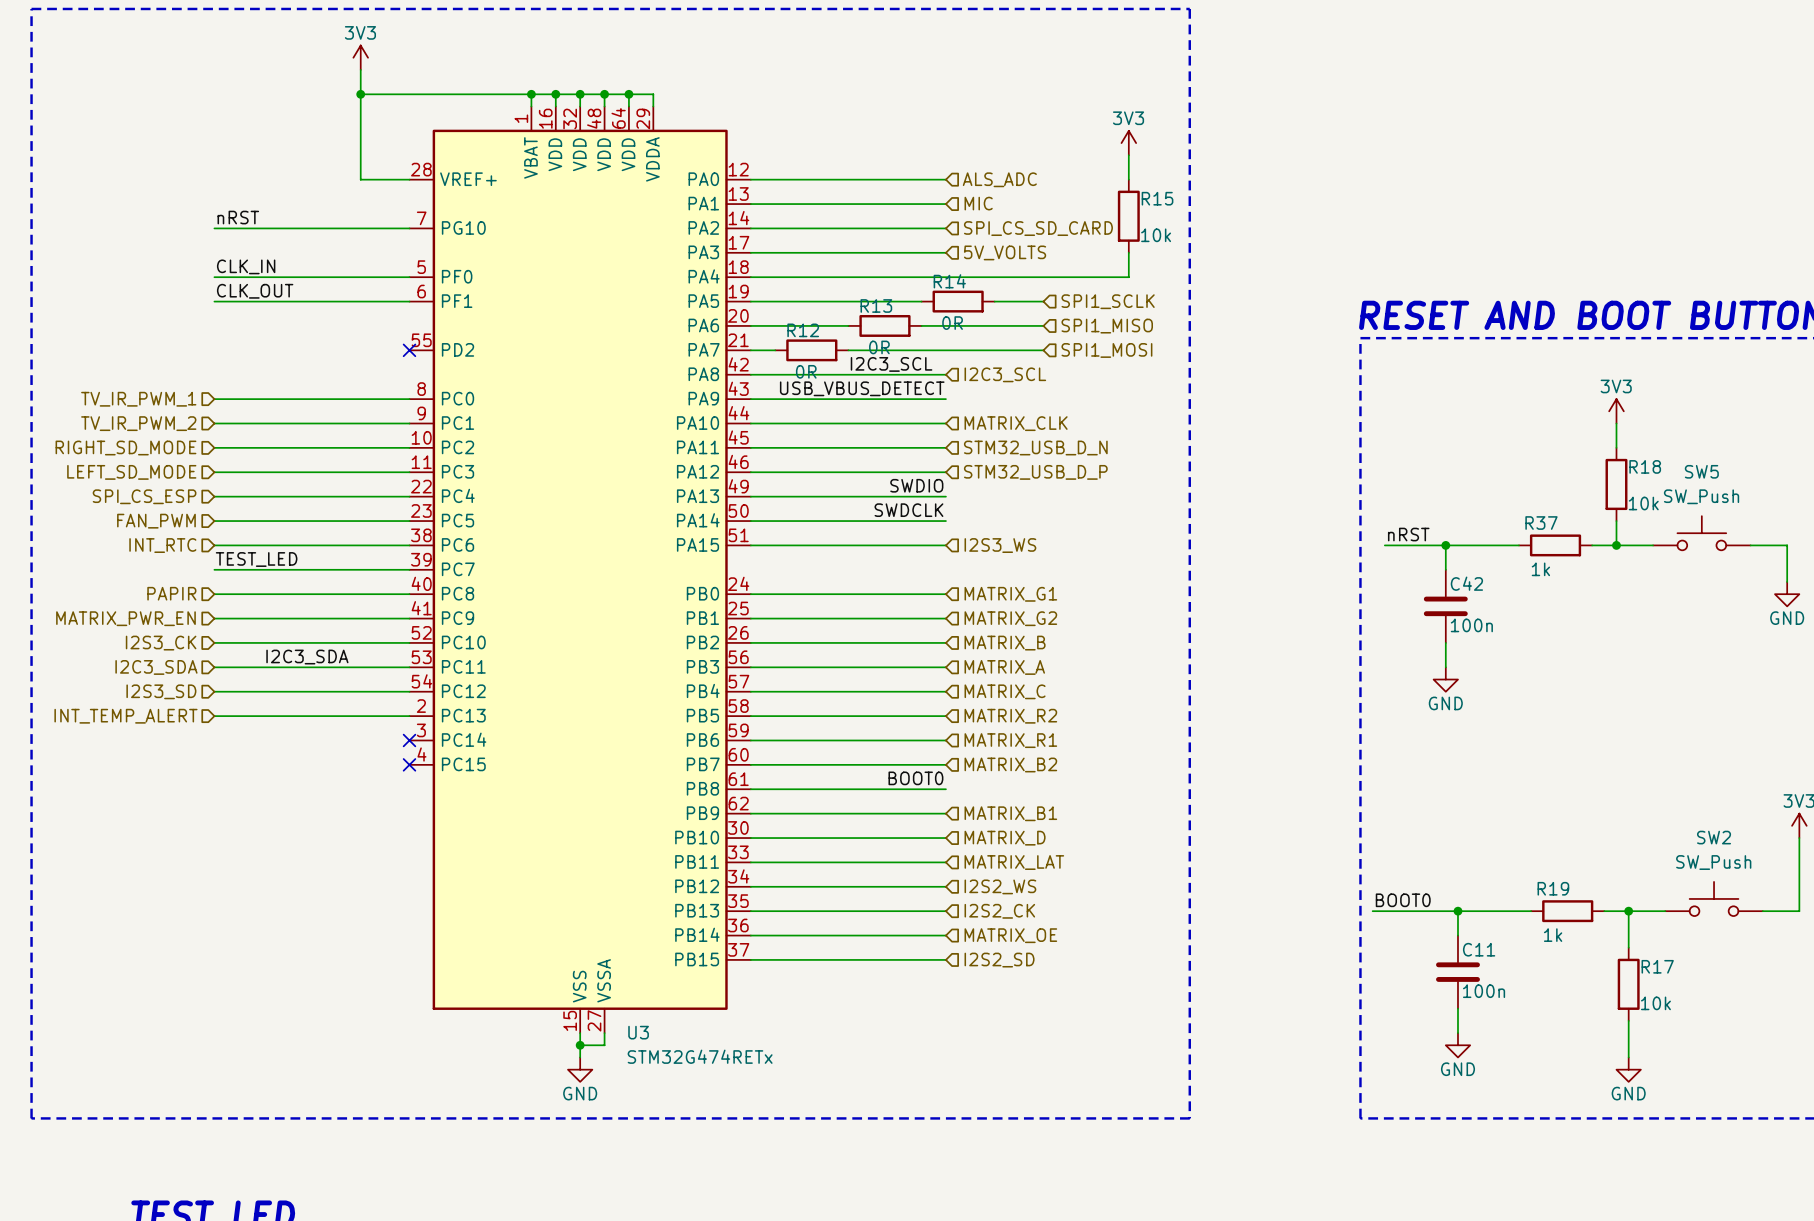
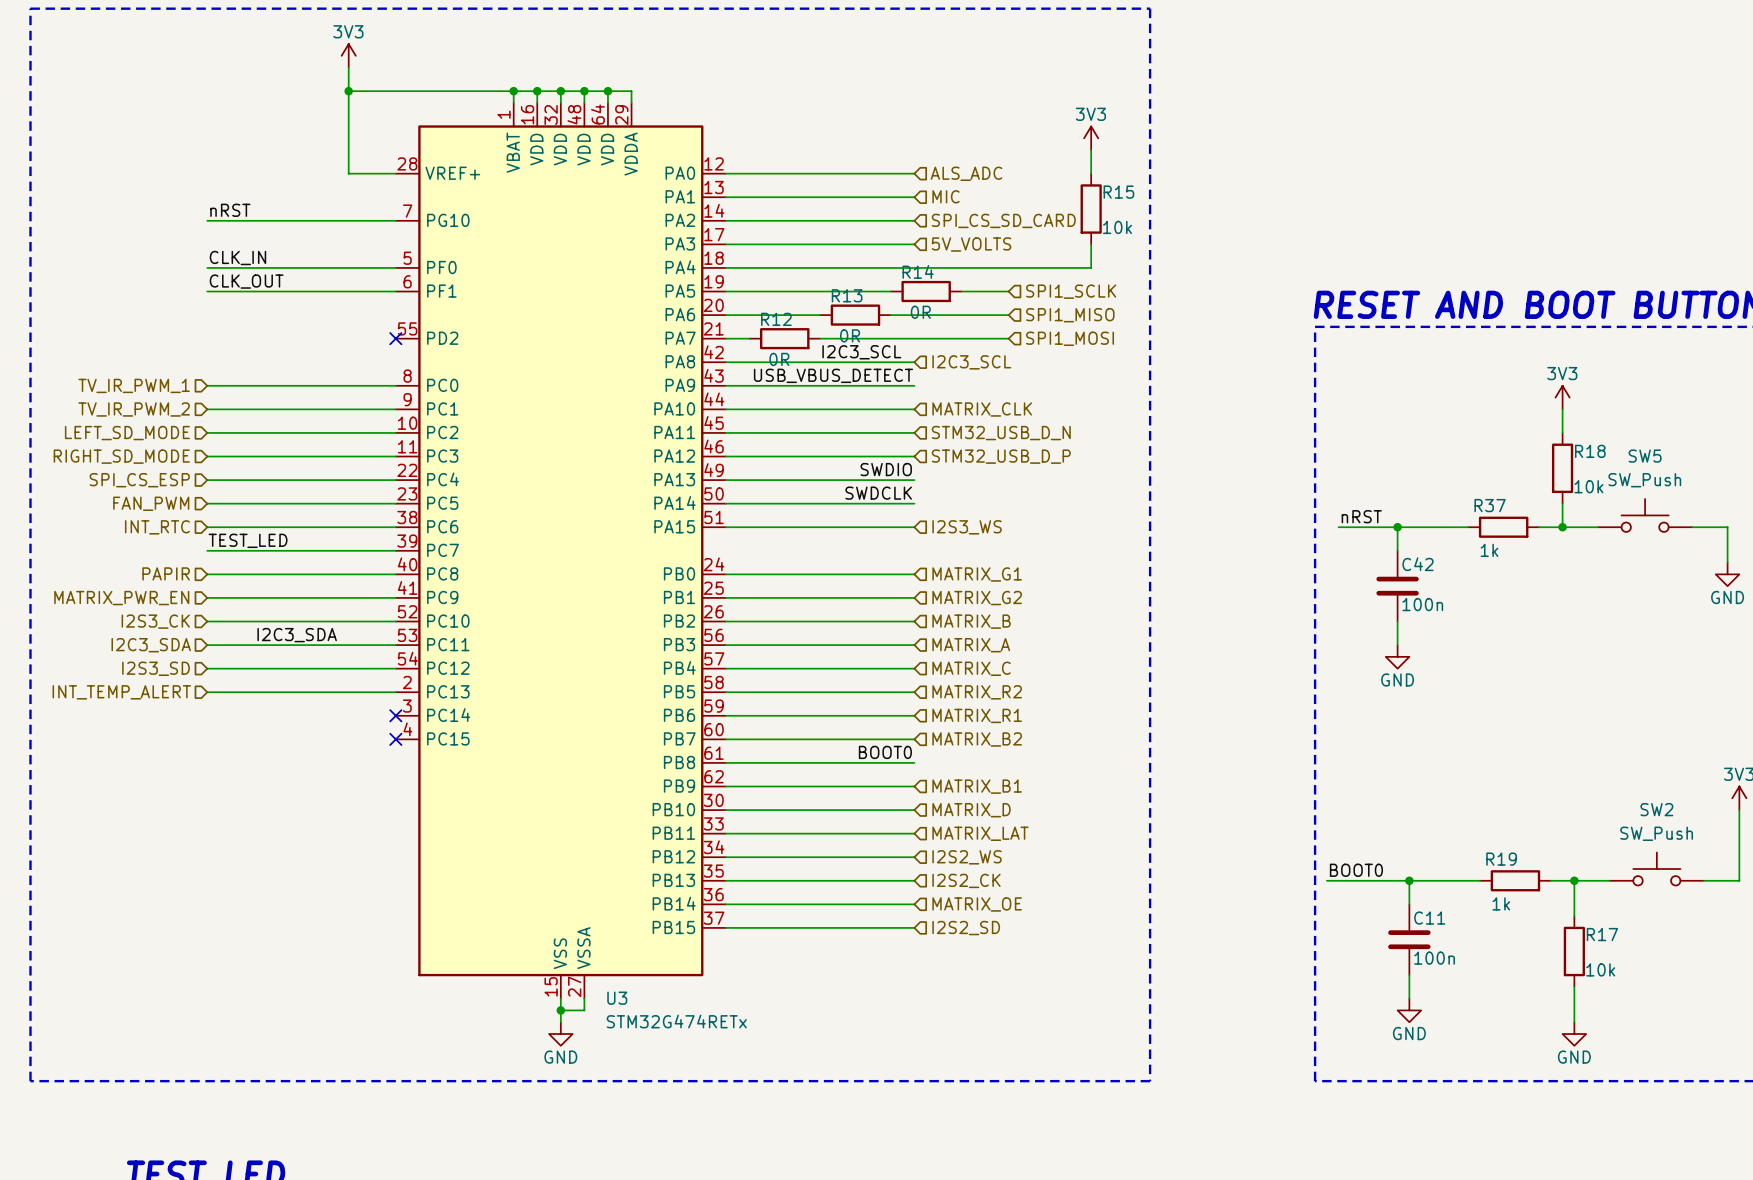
hierarchical label: RIGHT_SD_MODE (125, 448) -> LEFT_SD_MODE (127, 433)
hierarchical label: LEFT_SD_MODE (131, 472) -> RIGHT_SD_MODE (121, 456)

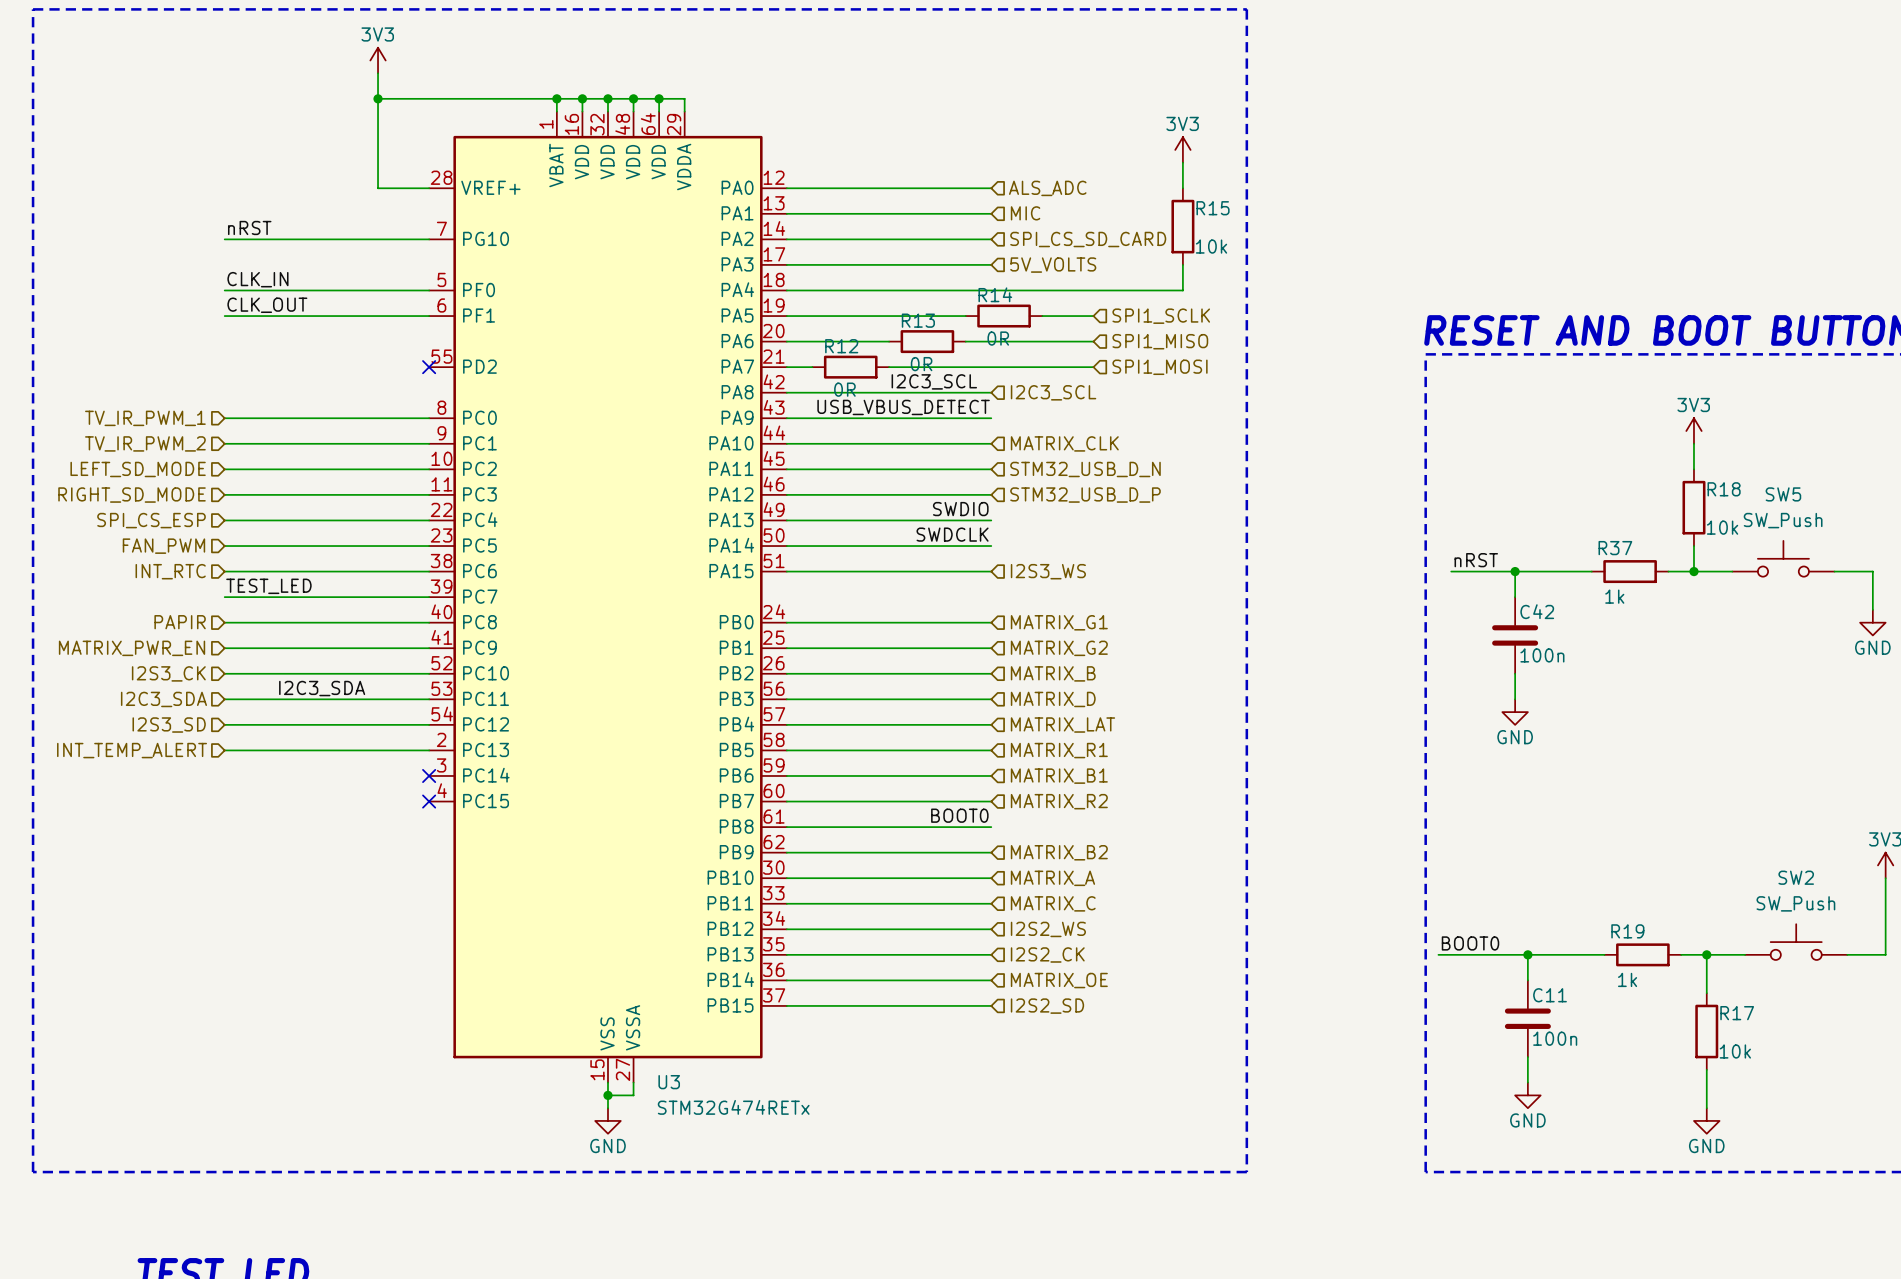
hierarchical label: MATRIX_A (971, 645) -> MATRIX_D (1053, 699)
hierarchical label: MATRIX_C (971, 668) -> MATRIX_LAT (1062, 725)
hierarchical label: MATRIX_R2 (977, 692) -> MATRIX_R1 (1059, 750)
hierarchical label: MATRIX_R1 (977, 715) -> MATRIX_B1 (1059, 776)
hierarchical label: MATRIX_B2 (977, 739) -> MATRIX_R2 (1059, 801)
hierarchical label: MATRIX_B1 (977, 786) -> MATRIX_B2 (1059, 852)
hierarchical label: MATRIX_D (971, 810) -> MATRIX_A (1052, 878)
hierarchical label: MATRIX_LAT (980, 833) -> MATRIX_C (1053, 903)

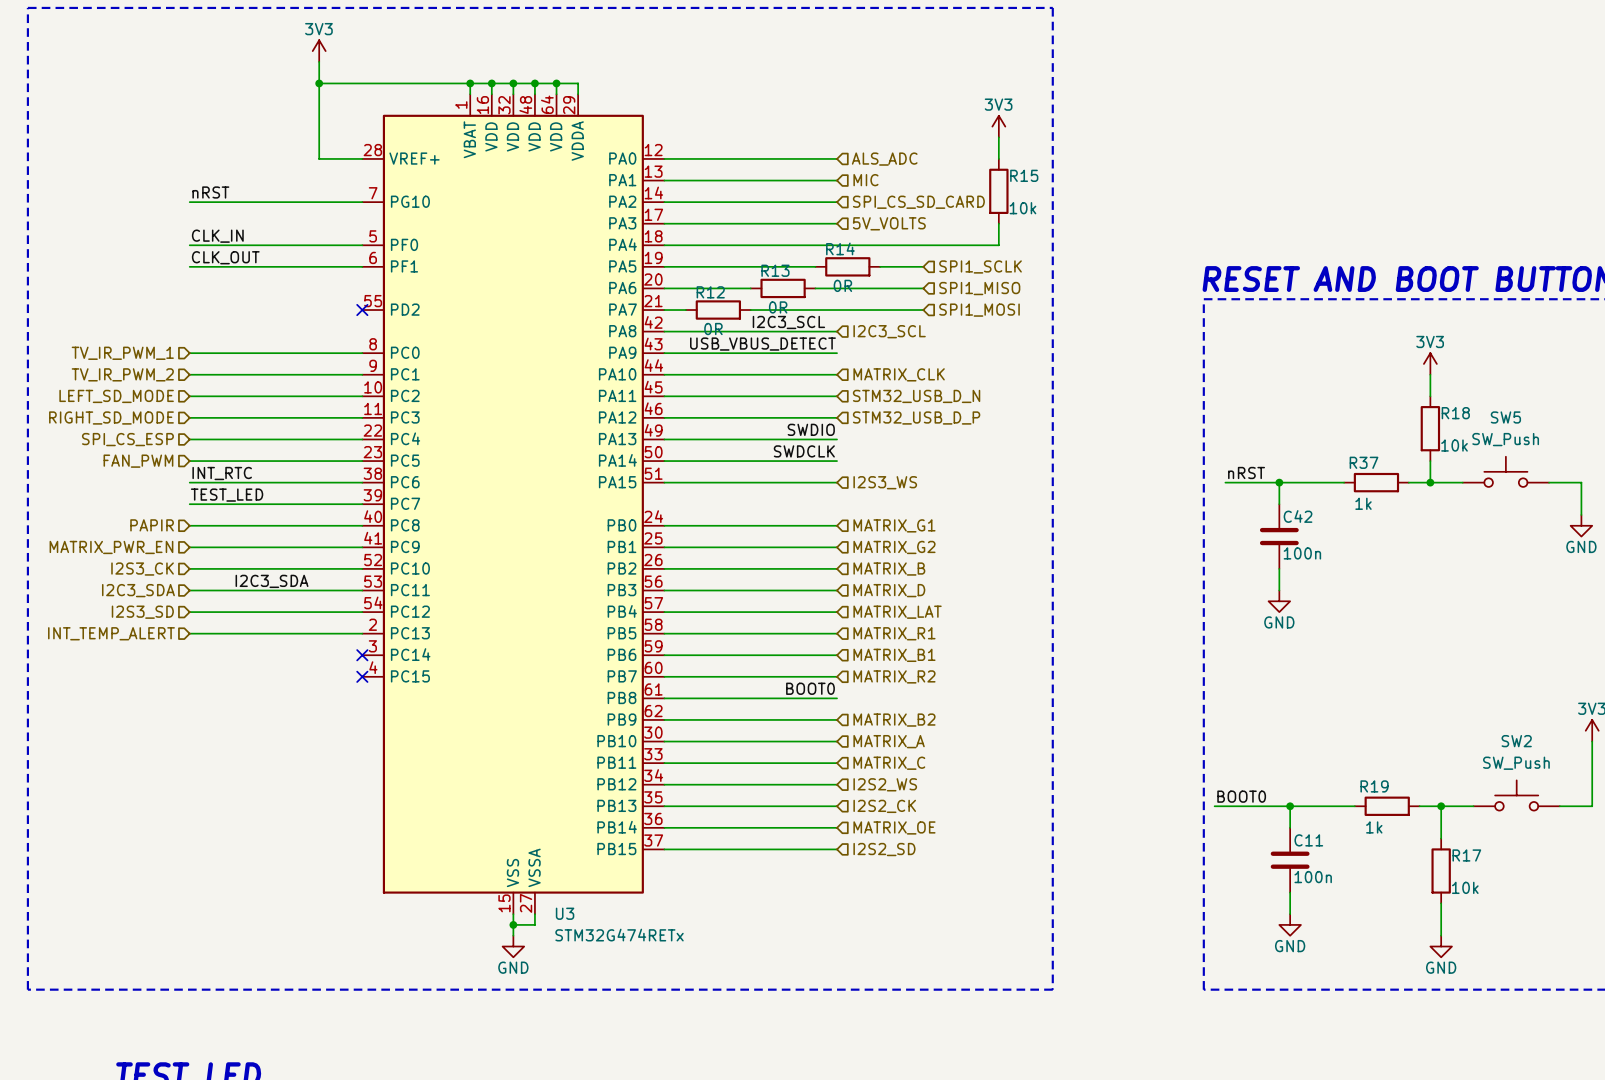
label: none -> INT_RTC (222, 473)
hierarchical label: INT_RTC (170, 571) -> none

